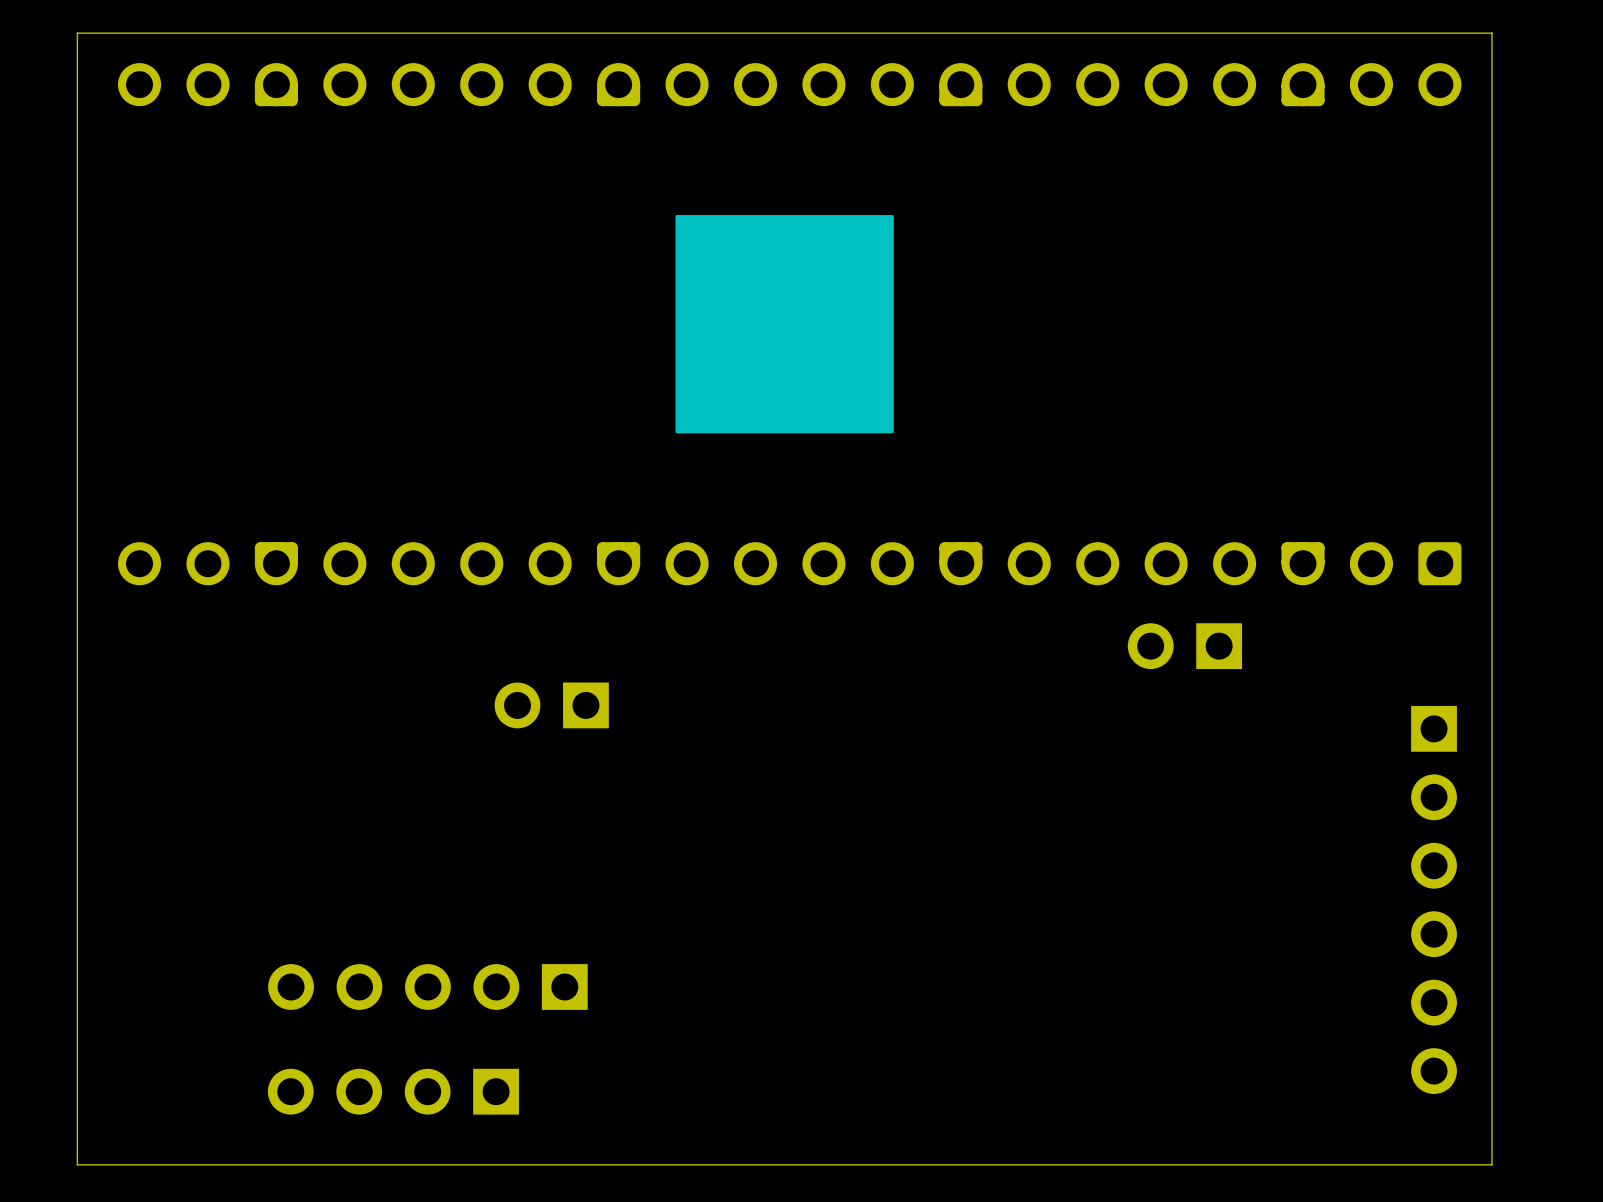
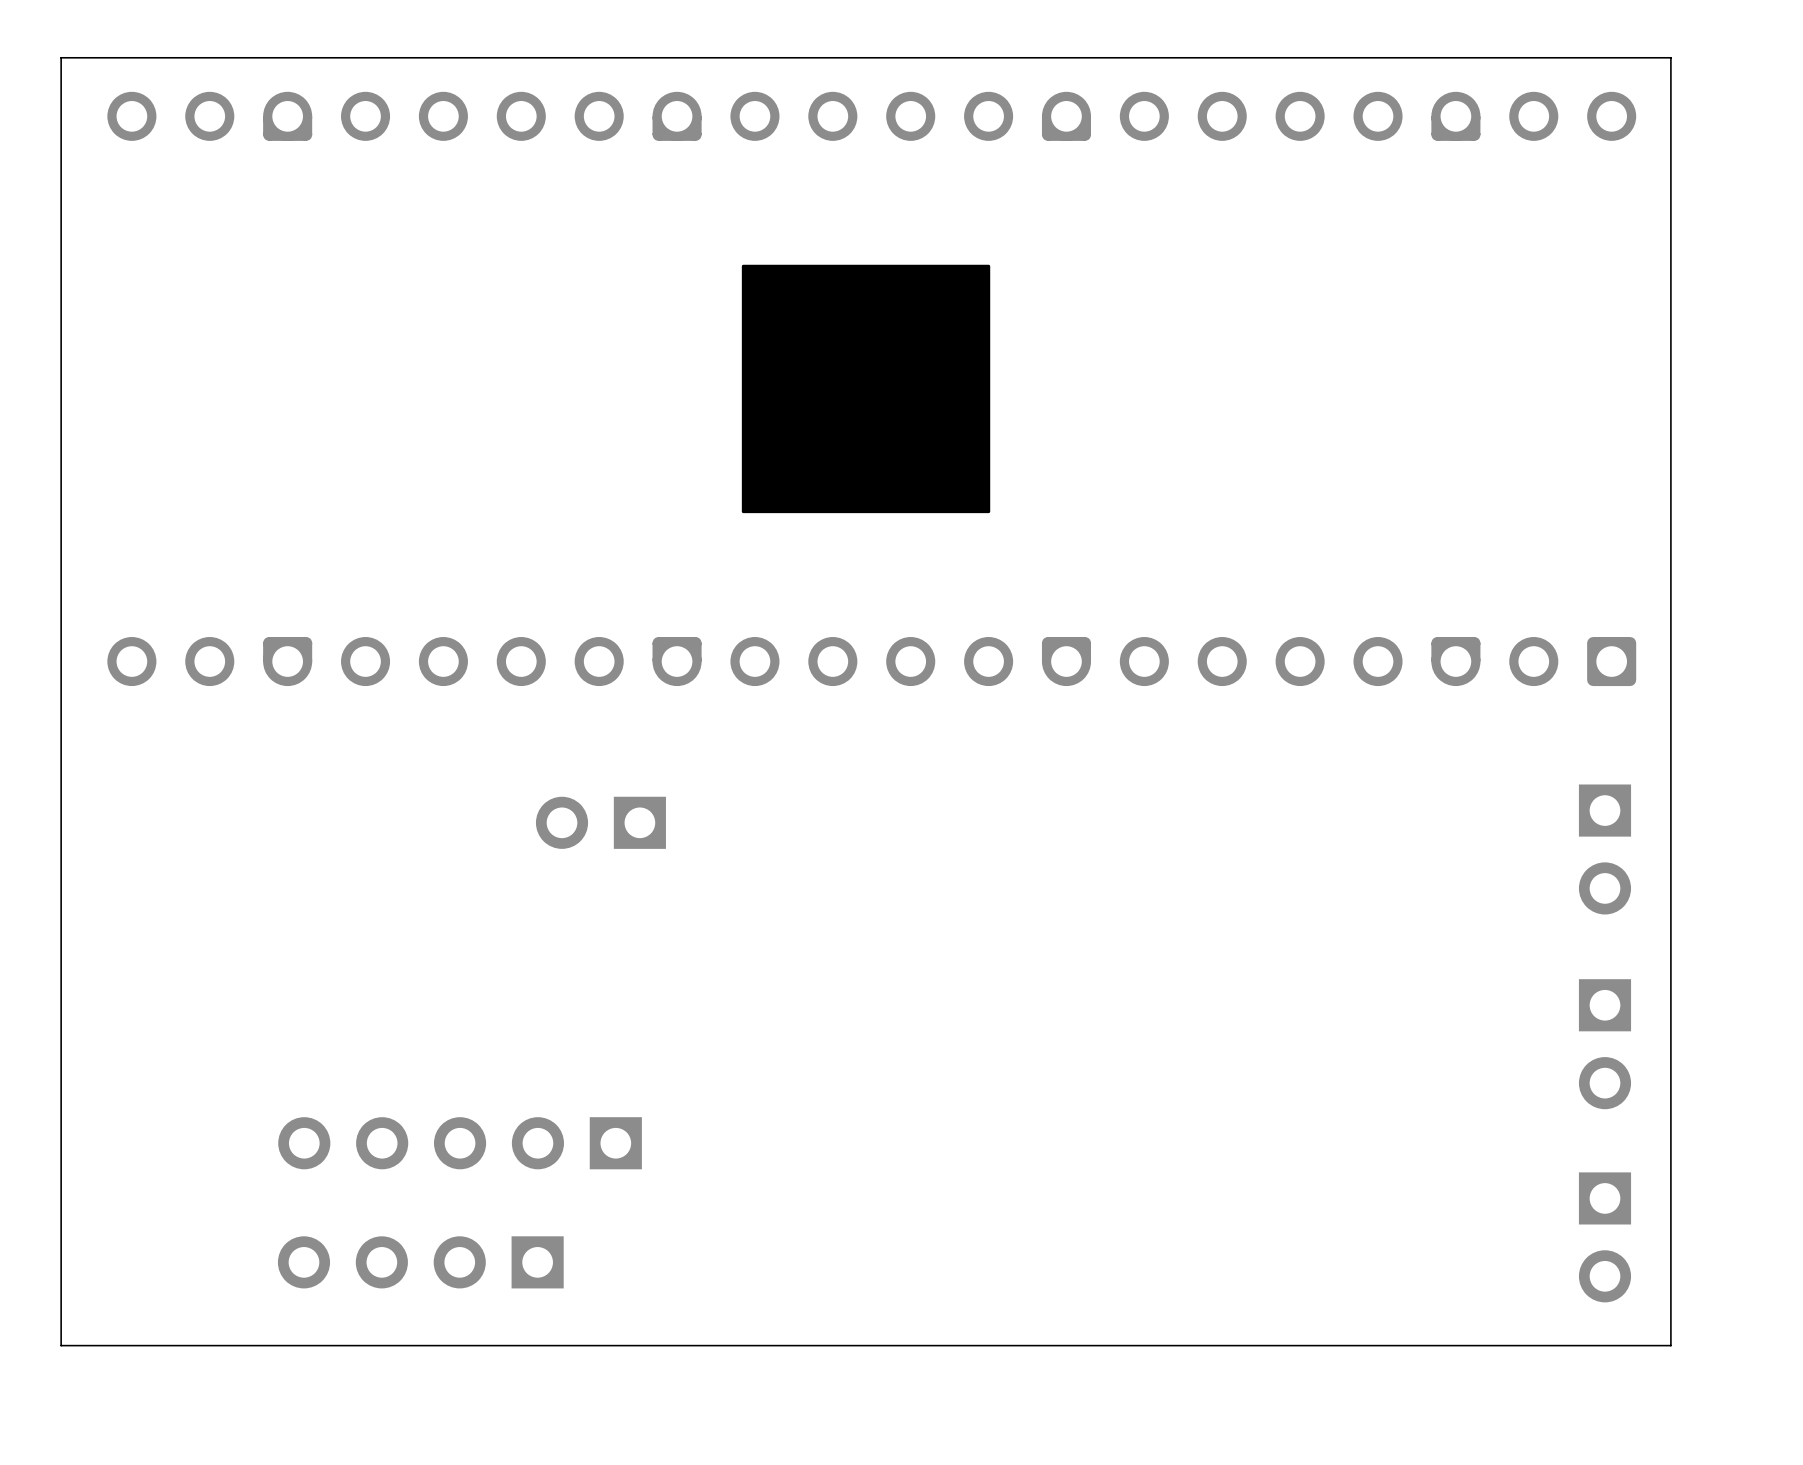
part: (1184, 646) -> none
part footprint: [1411, 705, 1457, 1094] -> [1578, 979, 1632, 1110]
part: none -> (1604, 849)
part: none -> (1604, 1237)

